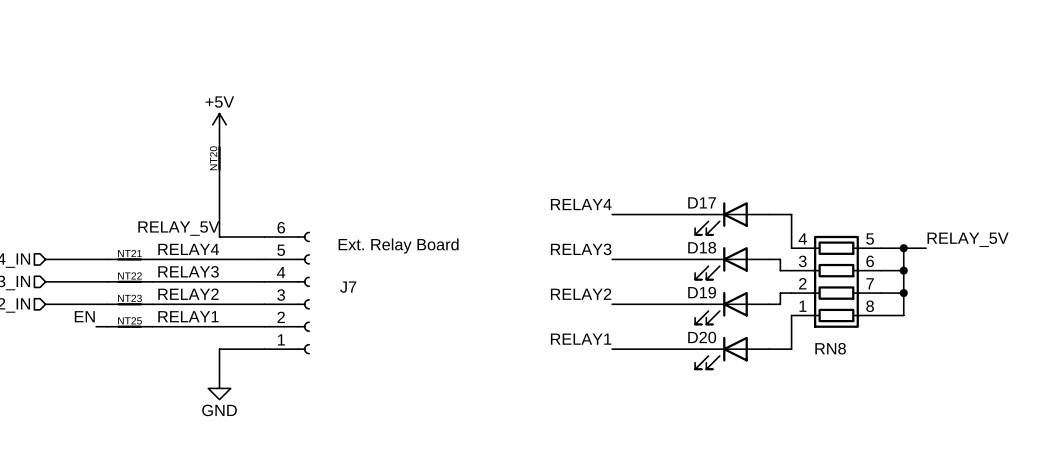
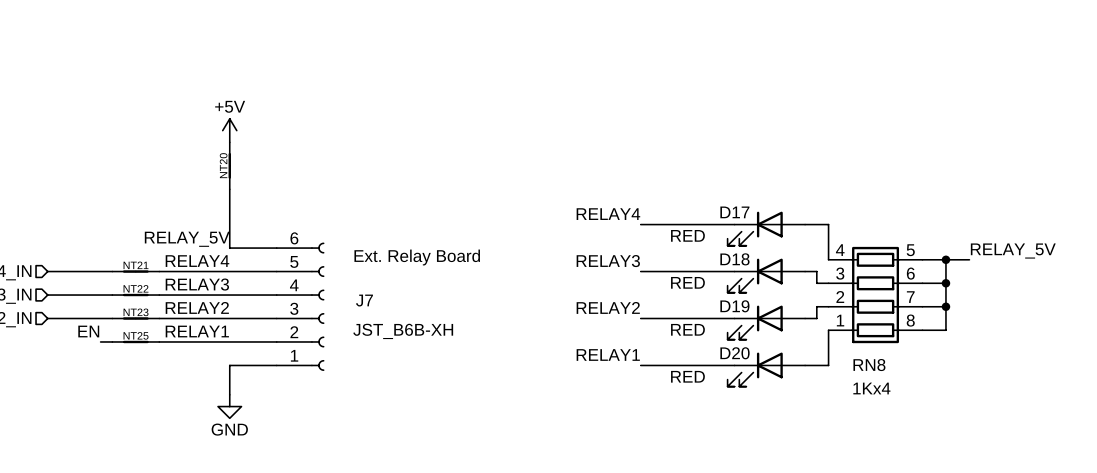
D17 value: none -> RED (687, 235)
D18 value: none -> RED (687, 282)
D19 value: none -> RED (687, 329)
J7 value: none -> JST_B6B-XH (403, 331)
D20 value: none -> RED (687, 376)
RN8 value: none -> 1Kx4 (871, 388)

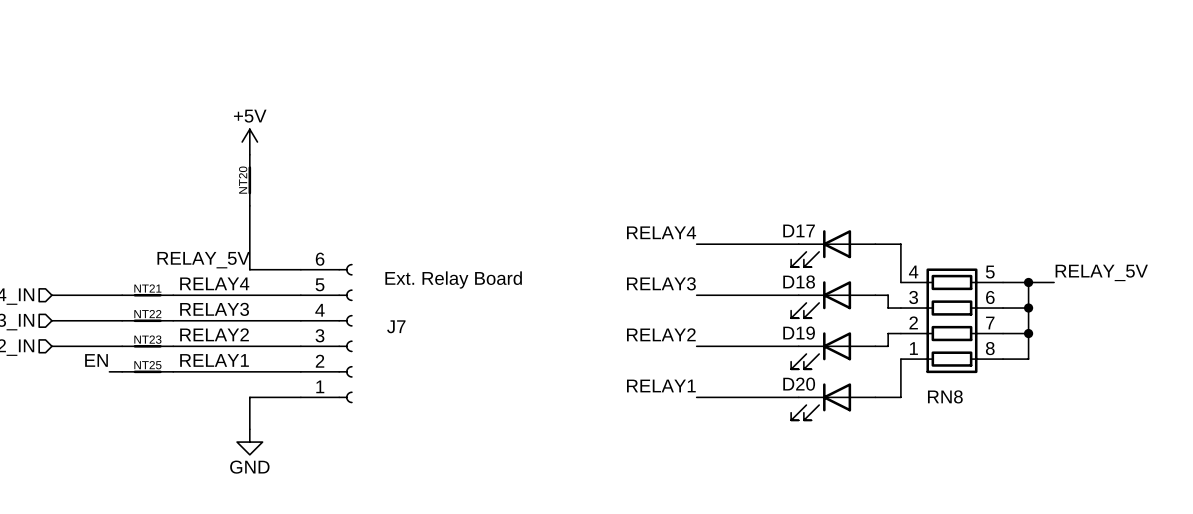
D17 value: RED (687, 235) -> none
D18 value: RED (687, 282) -> none
D19 value: RED (687, 329) -> none
J7 value: JST_B6B-XH (403, 331) -> none
D20 value: RED (687, 376) -> none
RN8 value: 1Kx4 (871, 388) -> none

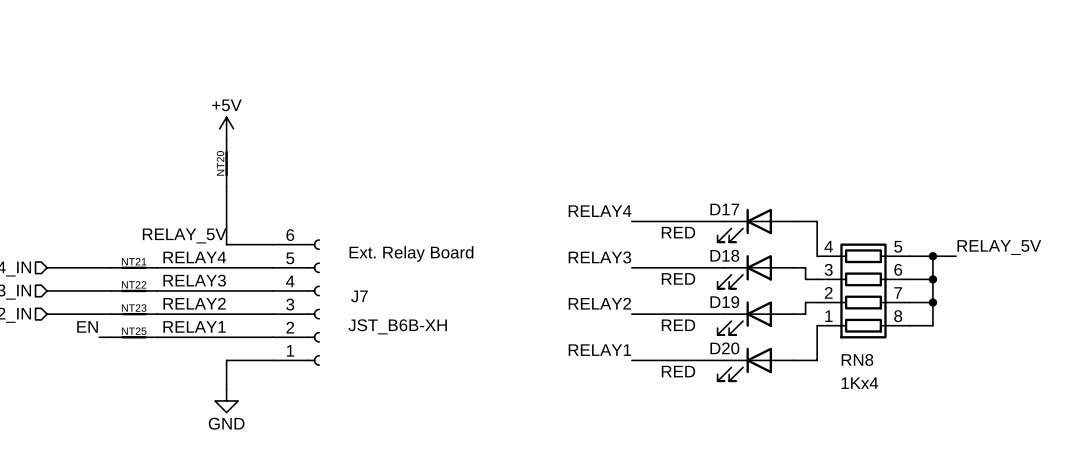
D17 value: none -> RED (678, 232)
D18 value: none -> RED (678, 278)
D19 value: none -> RED (678, 325)
J7 value: none -> JST_B6B-XH (397, 326)
D20 value: none -> RED (678, 371)
RN8 value: none -> 1Kx4 (859, 383)

